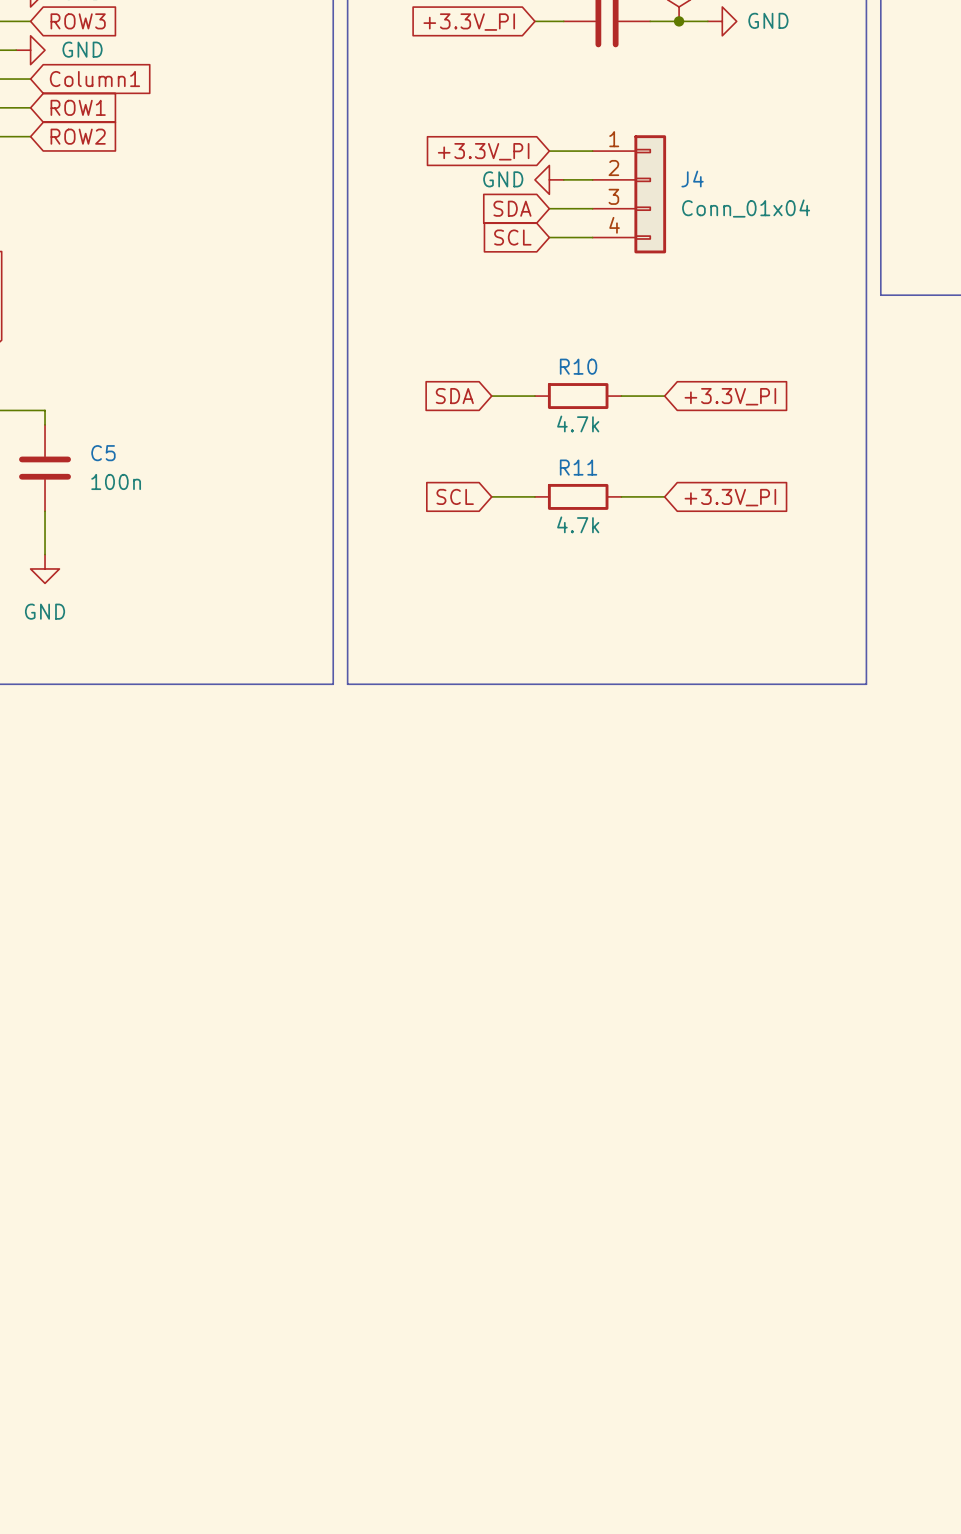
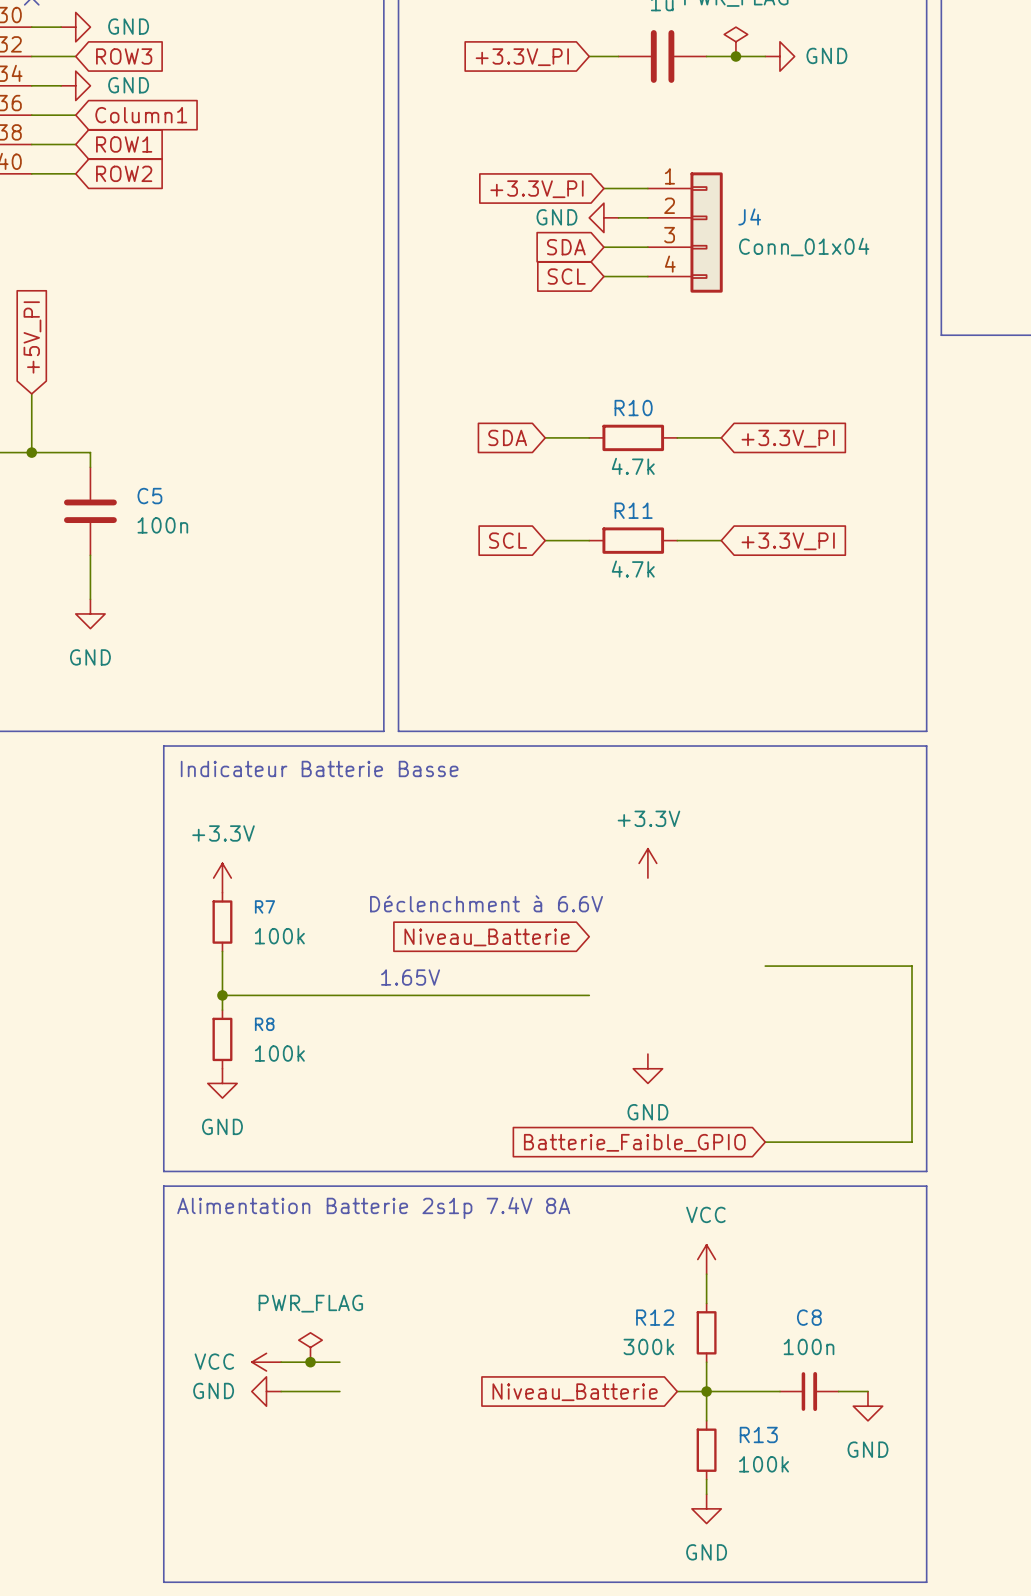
line: none -> (163, 746) (163, 1171) (926, 1171) (926, 746) (163, 746)
text: none -> Indicateur Batterie Basse (319, 768)
power symbol: none -> +3.3V (647, 863)
power symbol: none -> +3.3V (222, 878)
text: none -> Déclenchment à 6.6V (486, 903)
R7: none -> 100k (222, 922)
global label: none -> Niveau_Batterie (487, 937)
wire: none -> (222, 951) (222, 1010)
wire: none -> (765, 966) (912, 966) (912, 1142) (765, 1142)
text: none -> 1.65V (410, 977)
wire: none -> (222, 995) (589, 995)
junction: none -> (222, 995)
R8: none -> 100k (222, 1039)
power symbol: none -> GND (647, 1068)
power symbol: none -> GND (222, 1083)
global label: none -> Batterie_Faible_GPIO (634, 1142)
line: none -> (163, 1186) (926, 1186) (926, 1582) (163, 1582) (163, 1186)
text: none -> Alimentation Batterie 2s1p 7.4V 8A (373, 1208)
power symbol: none -> VCC (706, 1259)
wire: none -> (706, 1274) (706, 1303)
R12: none -> 300k (706, 1332)
power symbol: none -> PWR_FLAG (310, 1347)
power symbol: none -> VCC (266, 1362)
wire: none -> (281, 1362) (339, 1362)
junction: none -> (310, 1362)
wire: none -> (706, 1362) (706, 1420)
power symbol: none -> GND (266, 1391)
wire: none -> (281, 1391) (339, 1391)
wire: none -> (677, 1391) (779, 1391)
junction: none -> (706, 1391)
C8: none -> 100n (809, 1391)
wire: none -> (838, 1391) (867, 1391)
global label: none -> Niveau_Batterie (575, 1392)
power symbol: none -> GND (867, 1406)
R13: none -> 100k (706, 1450)
wire: none -> (706, 1479) (706, 1494)
power symbol: none -> GND (706, 1508)

